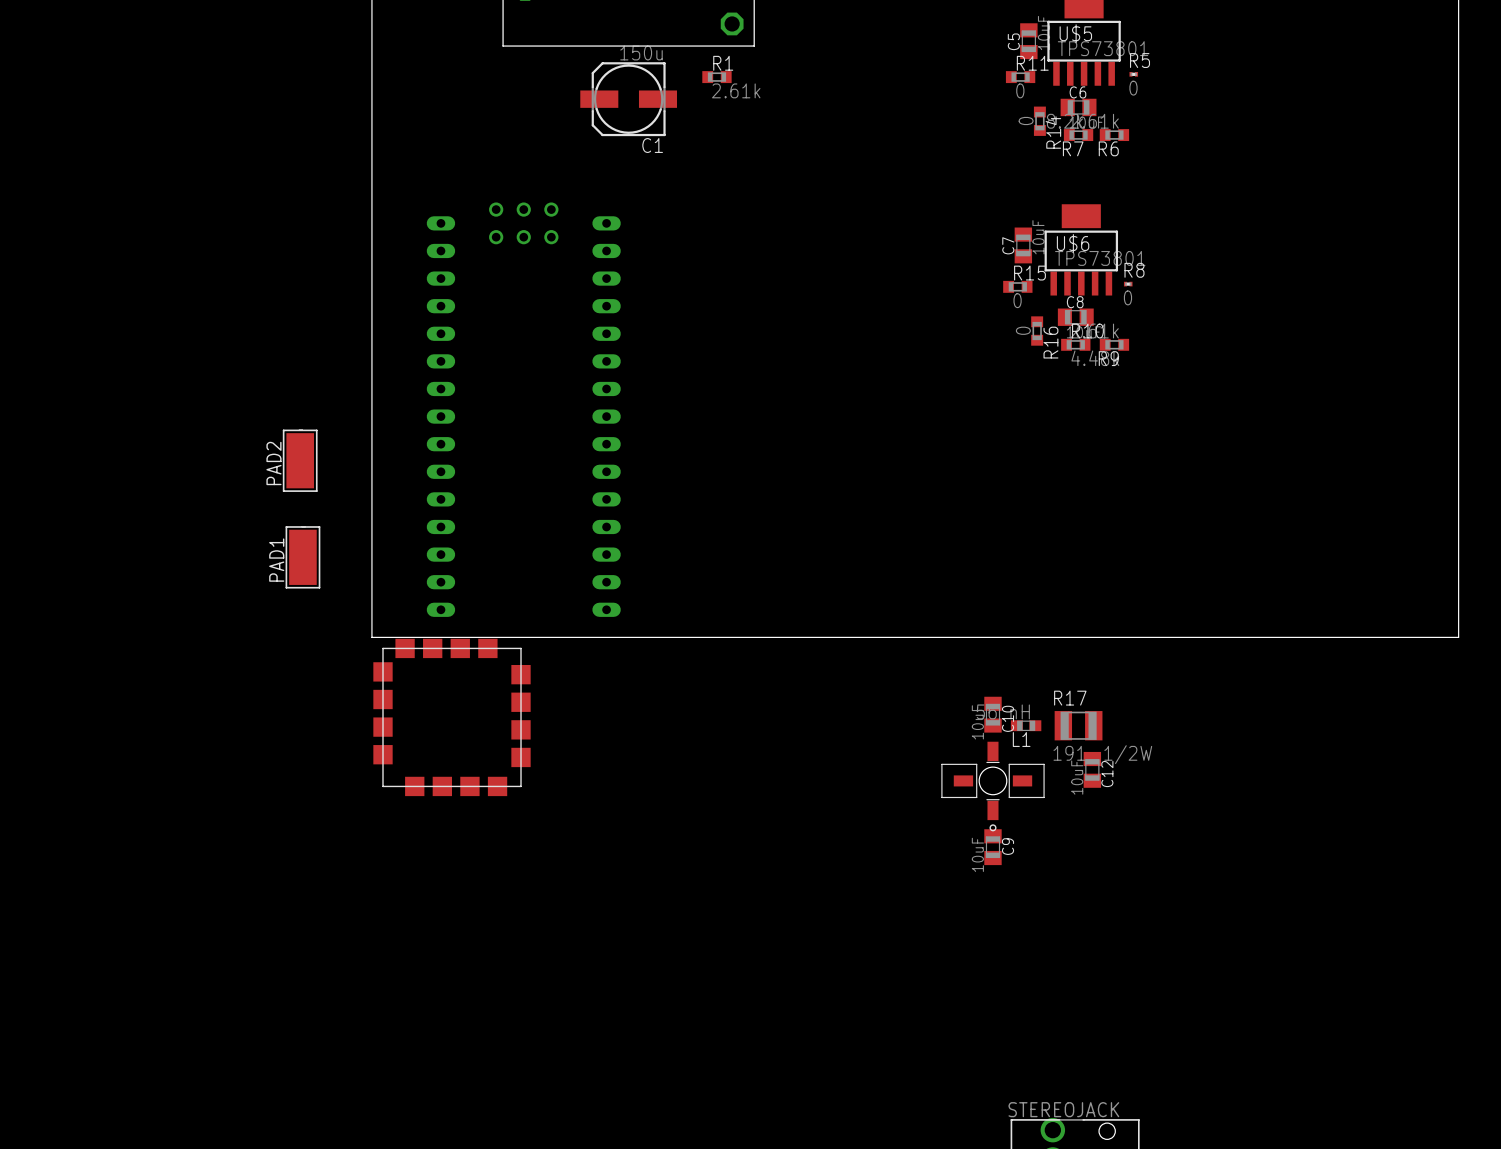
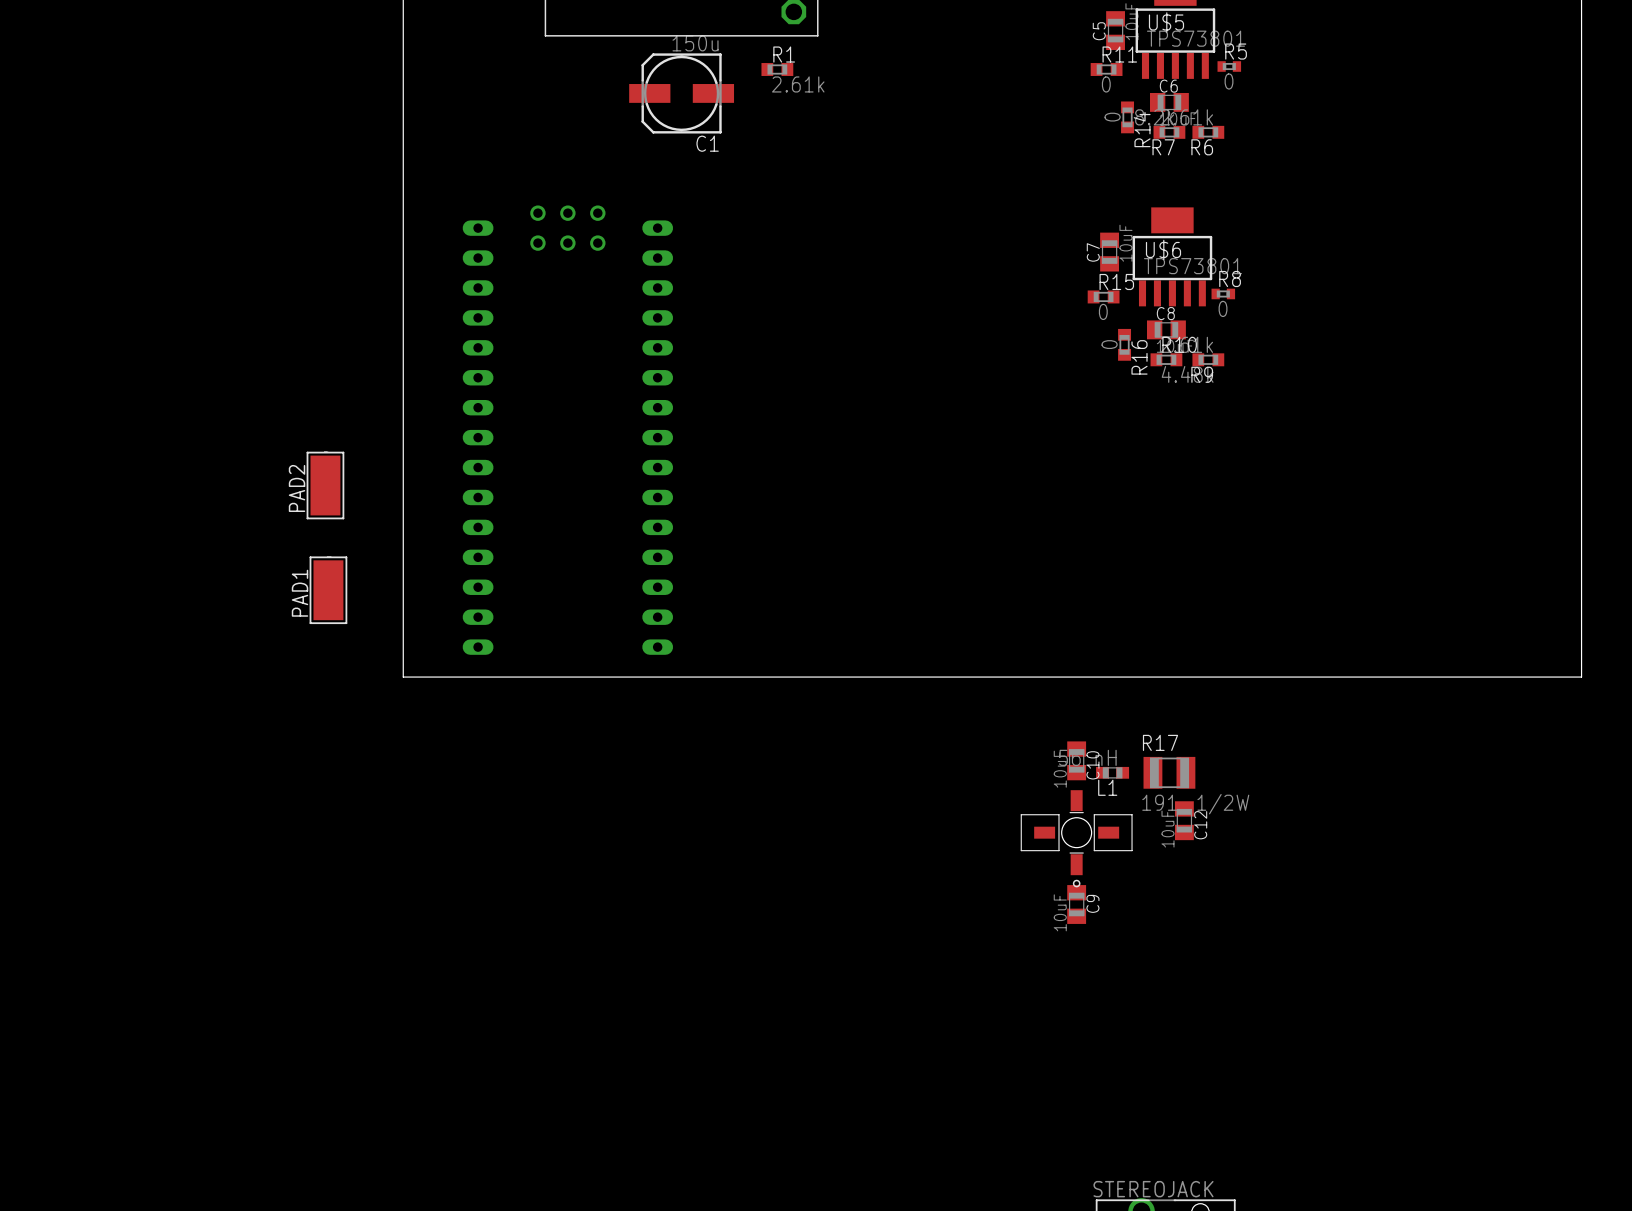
R5 footprint: [1129, 71, 1139, 77] -> [1217, 61, 1242, 72]
R8 footprint: [1123, 281, 1133, 287] -> [1211, 288, 1236, 300]
part: (452, 717) -> none

